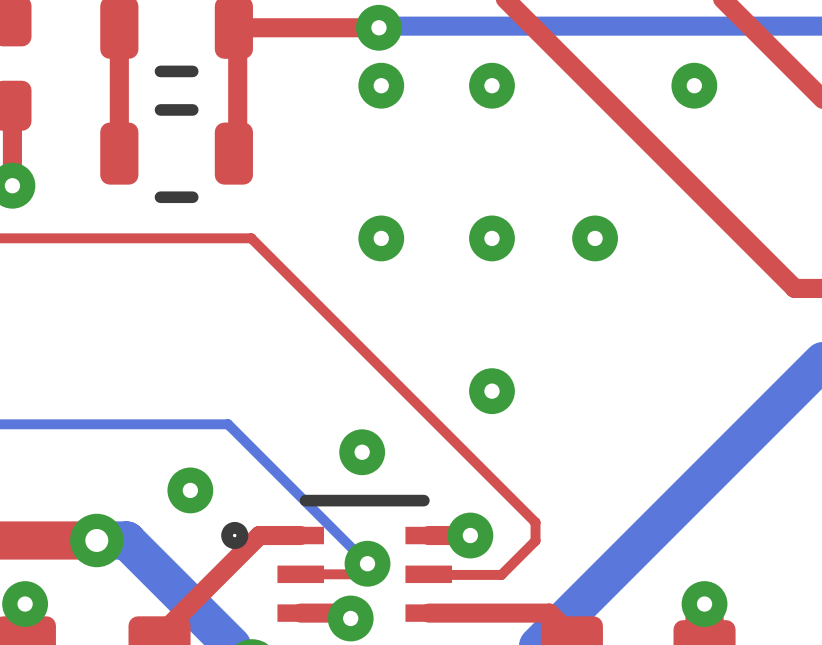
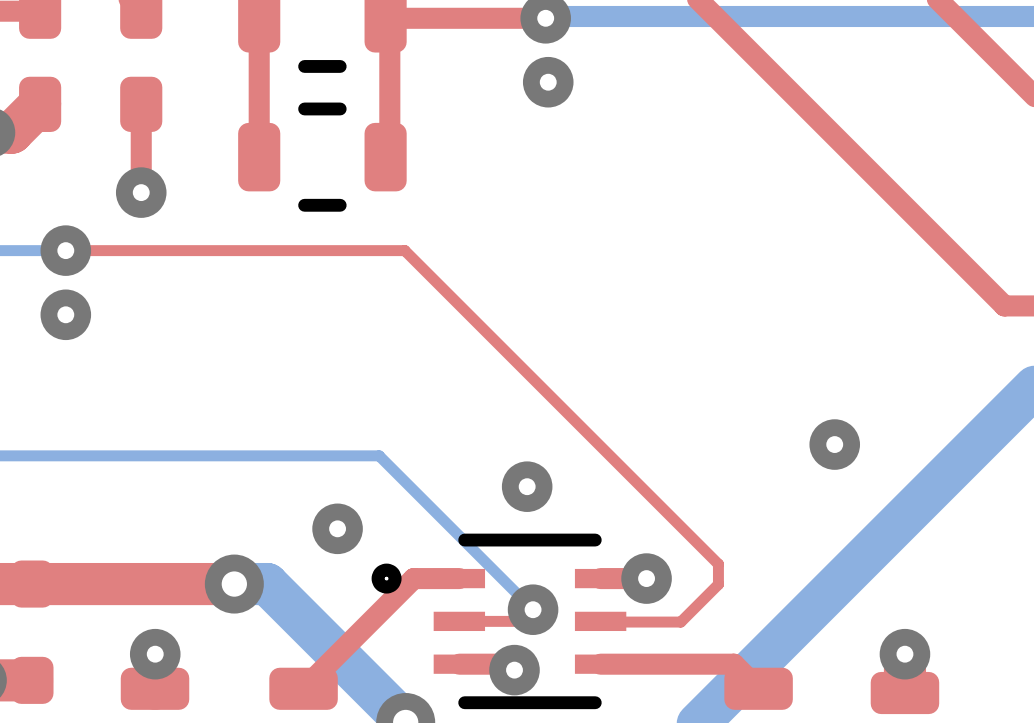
via: (491, 85) -> none
via: (694, 85) -> none
via: (381, 238) -> none
via: (491, 238) -> none
via: (595, 238) -> none
via: (491, 391) -> none
via: none -> (834, 444)

